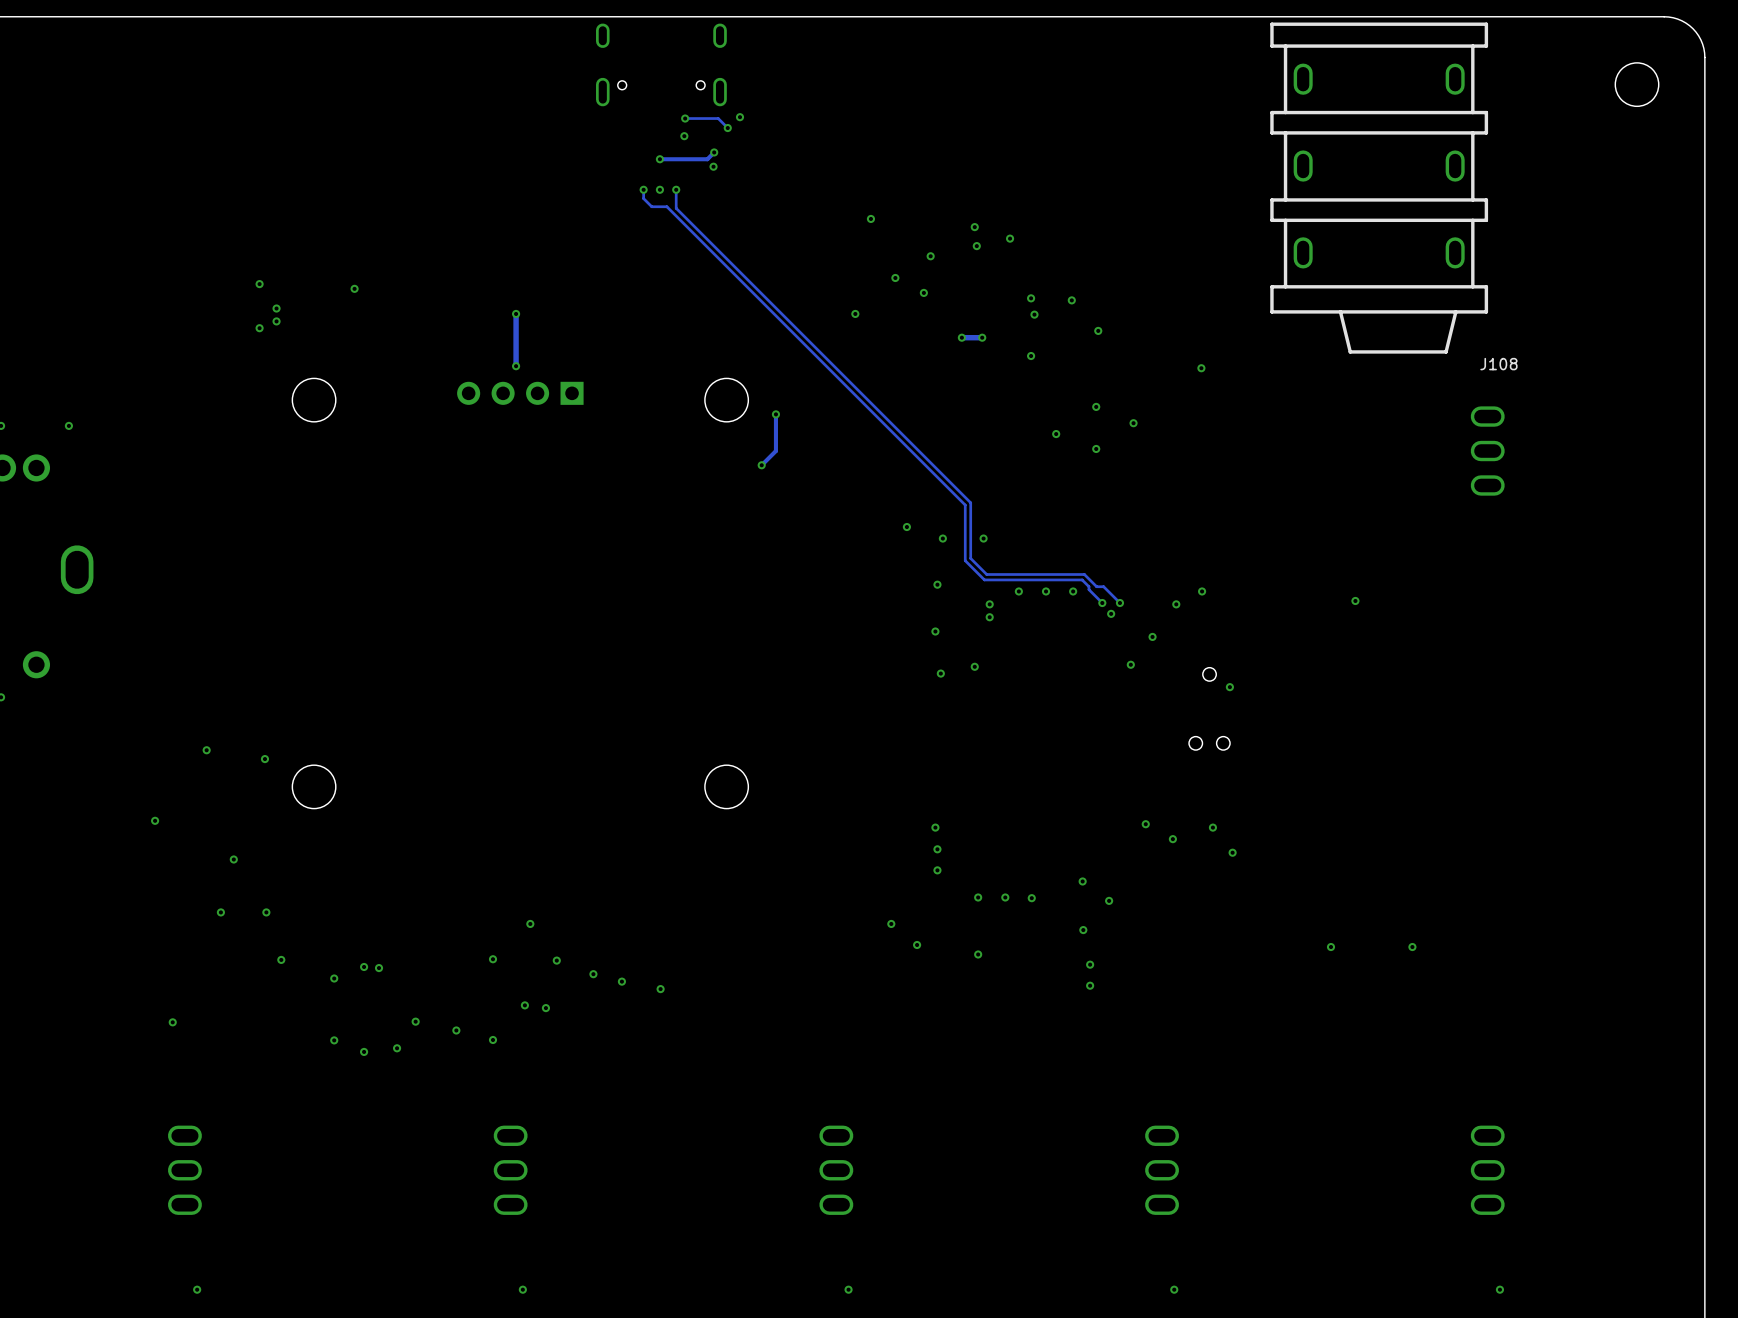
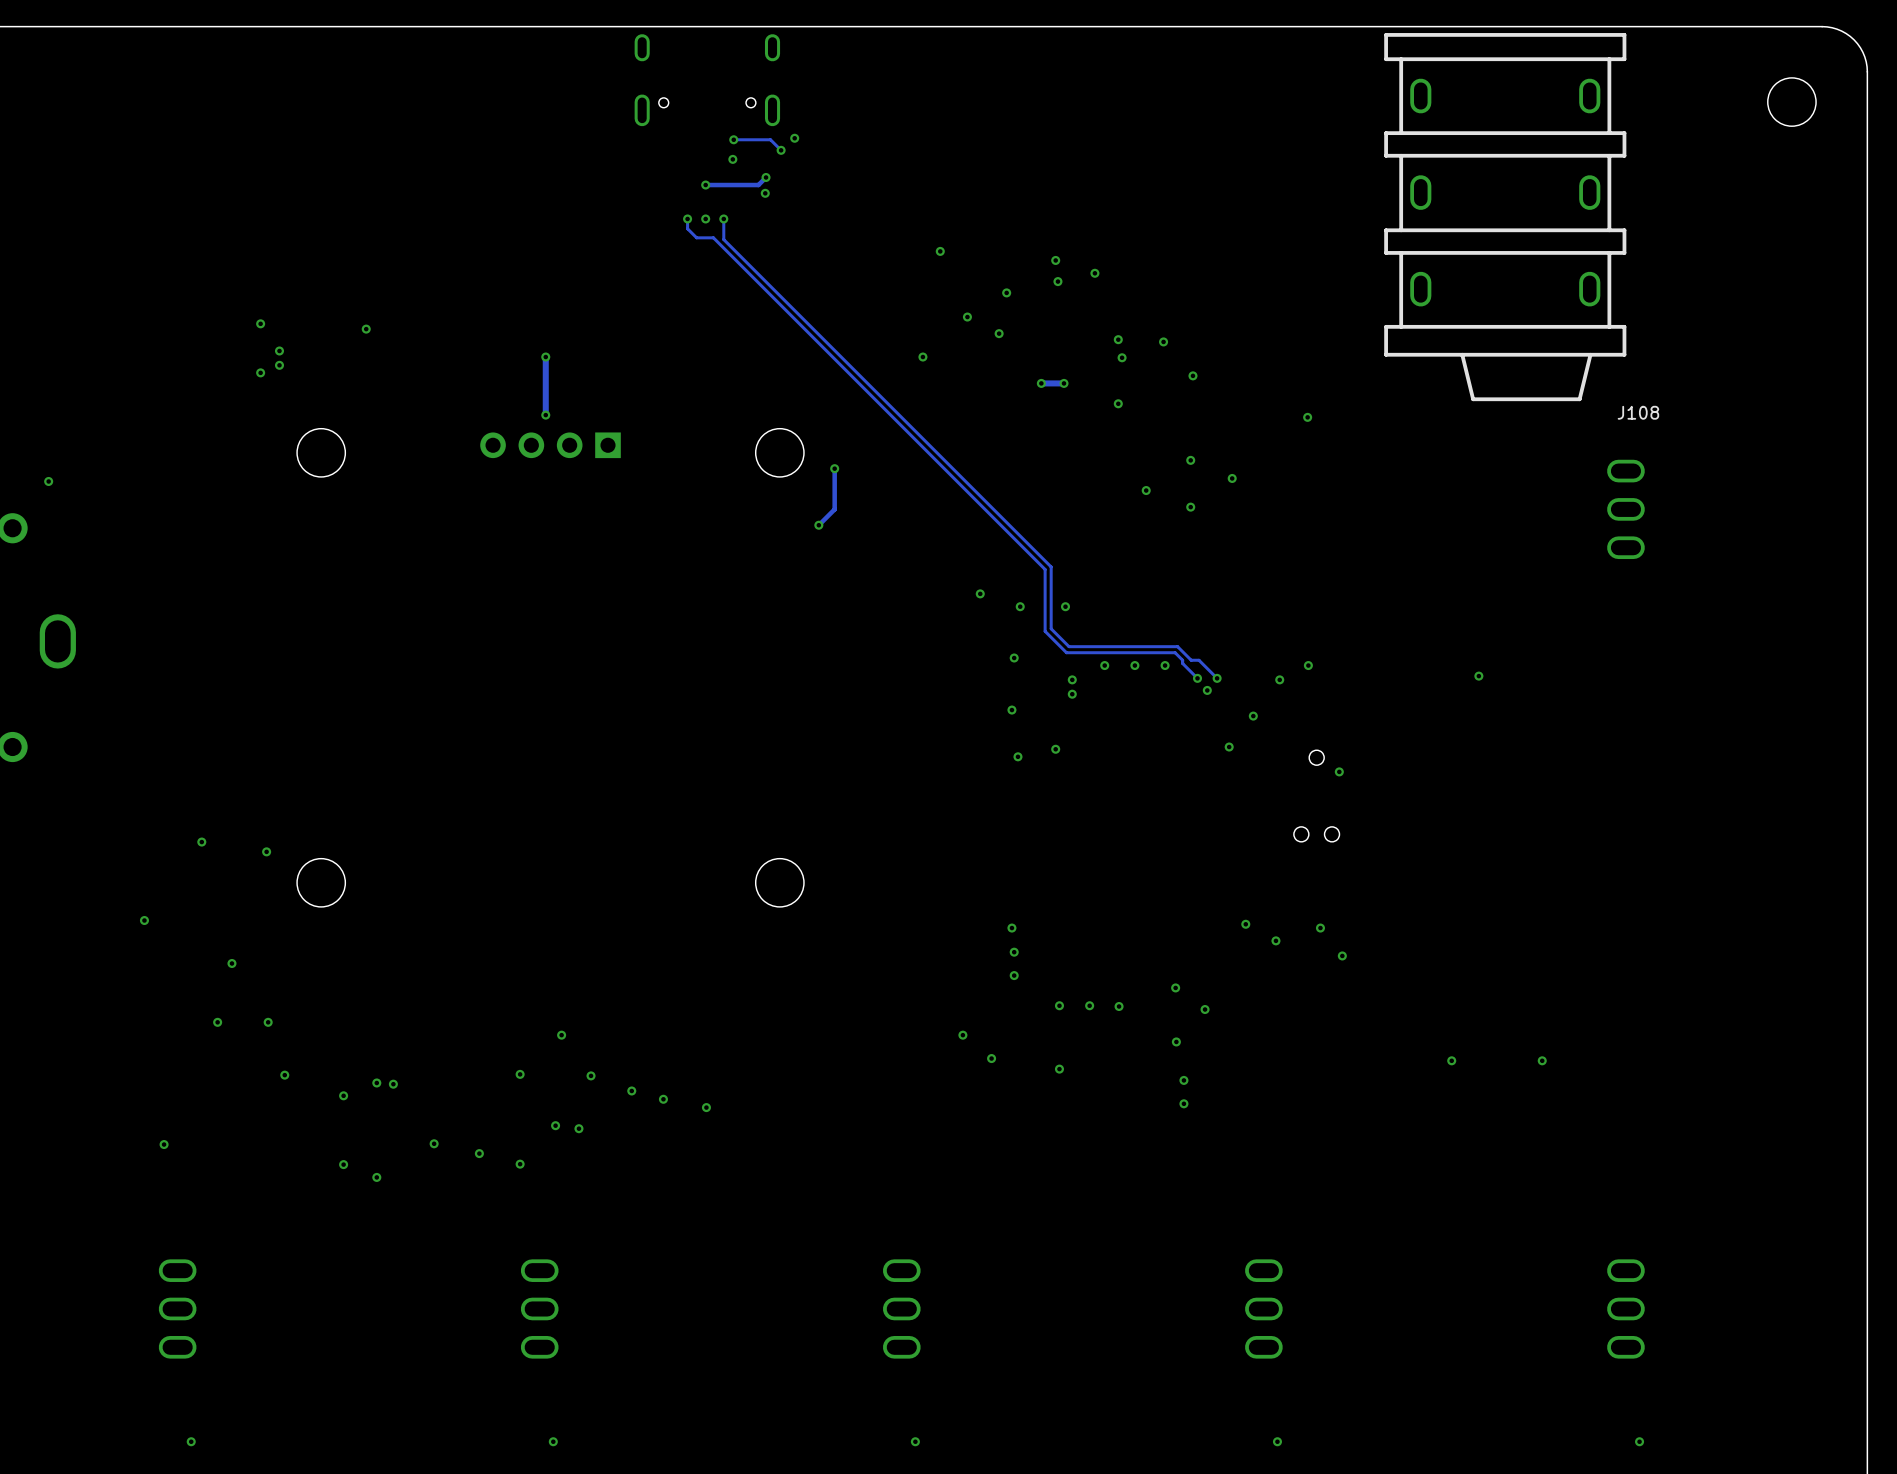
via: (397, 1048) -> none

